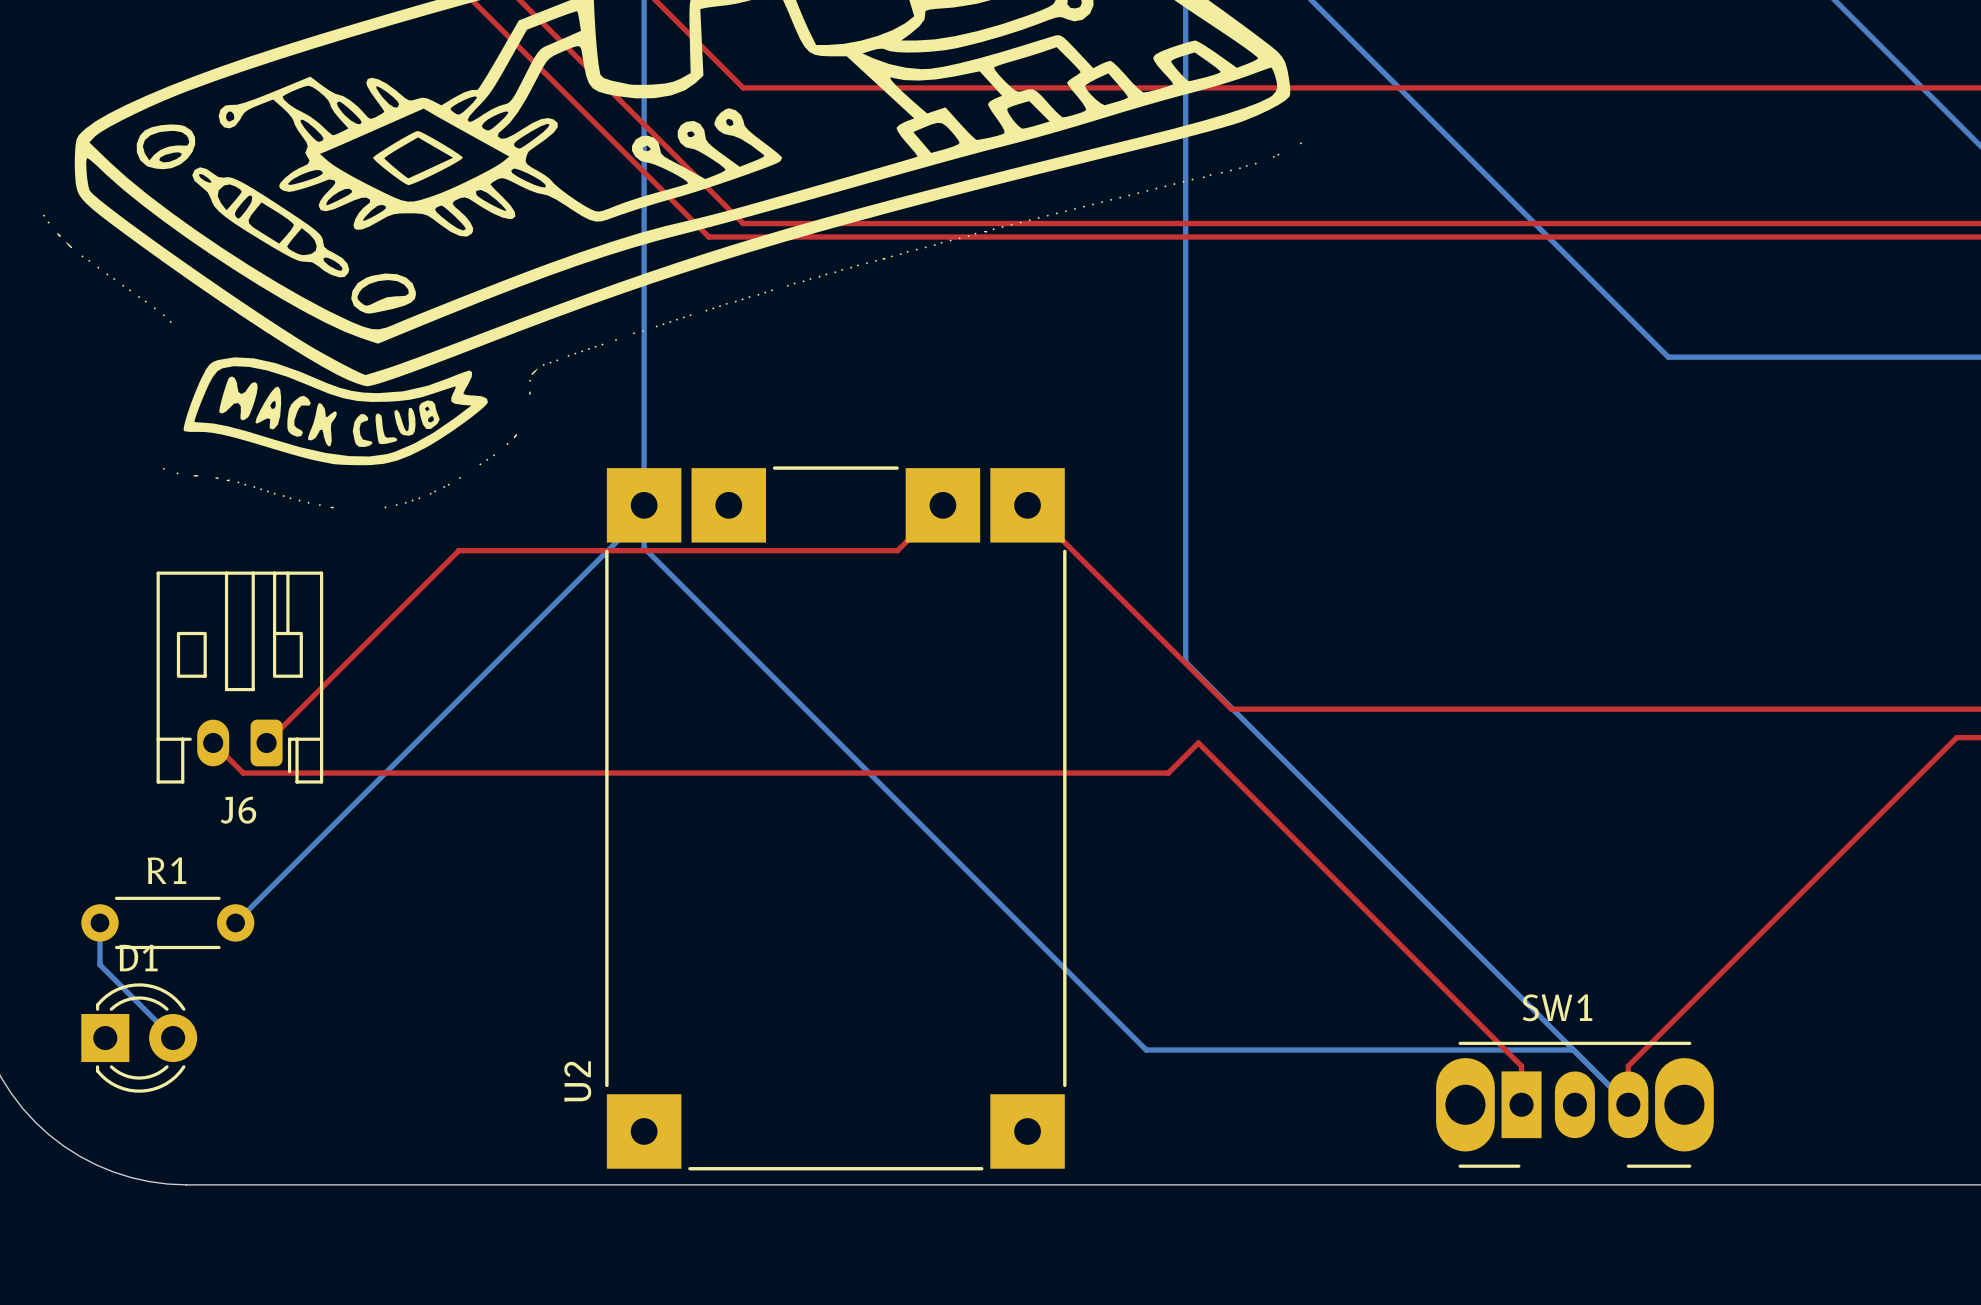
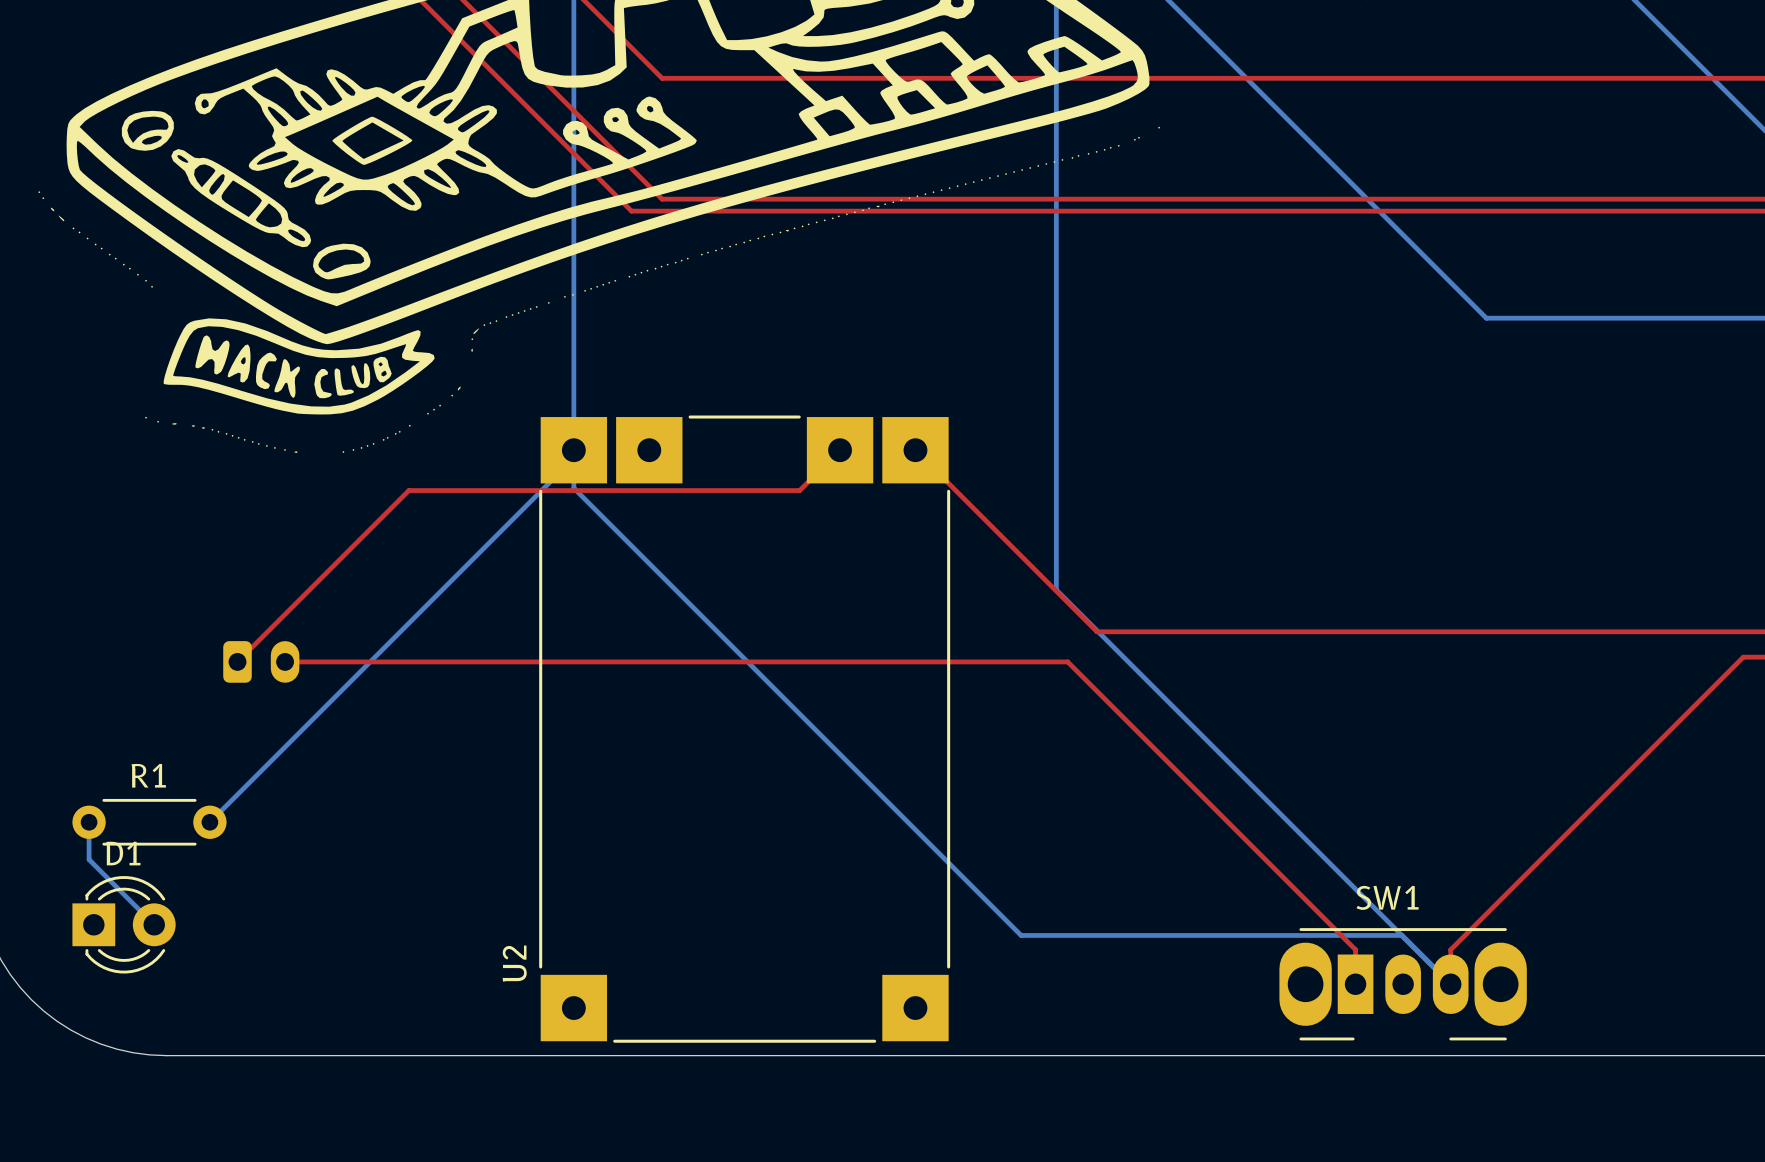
J6 side: top (239, 677) -> bottom (261, 661)
top track: (213, 742) (243, 773) (1168, 773) (1198, 742) -> (285, 661) (1067, 661)

